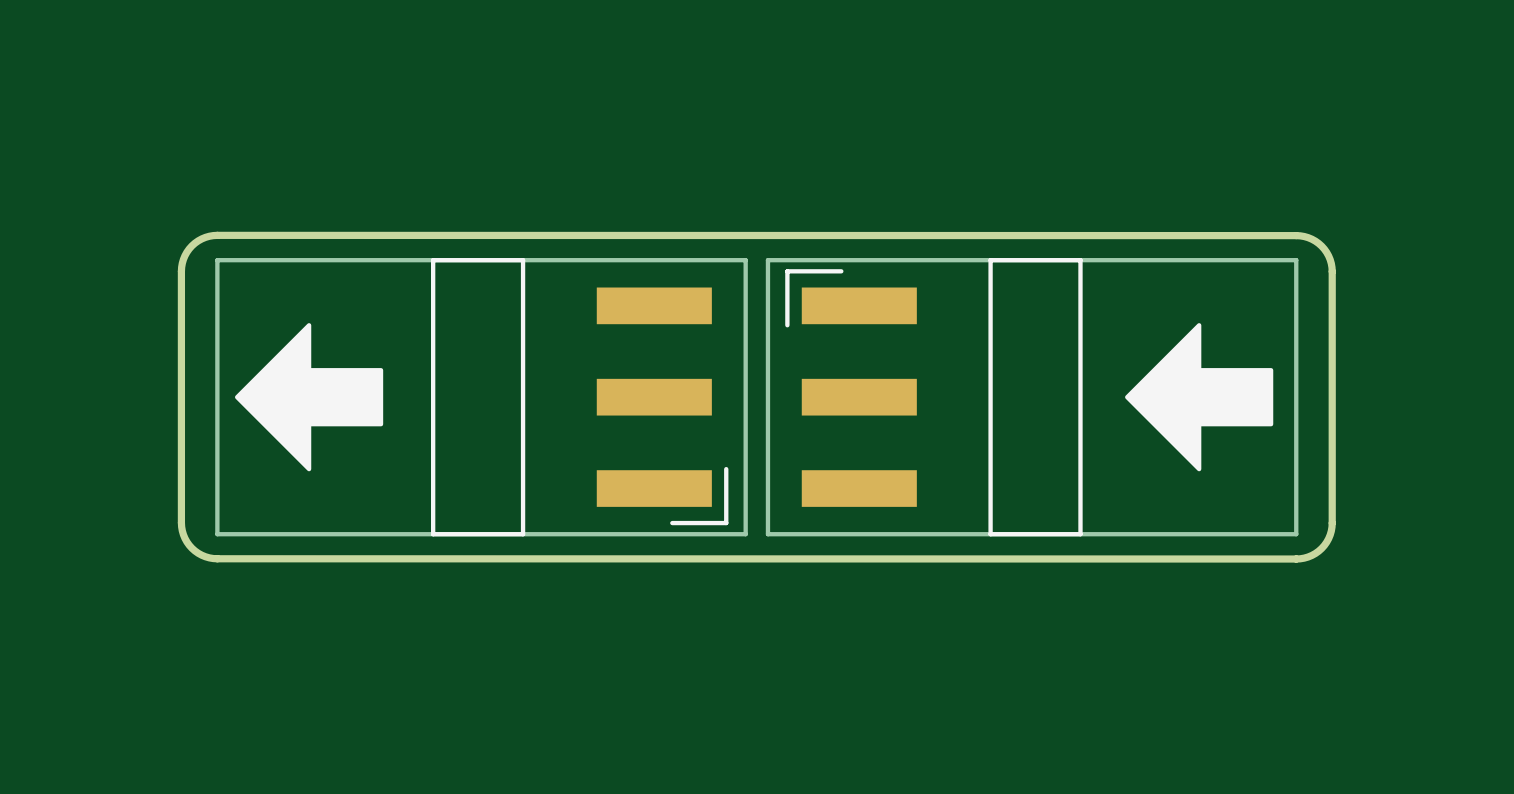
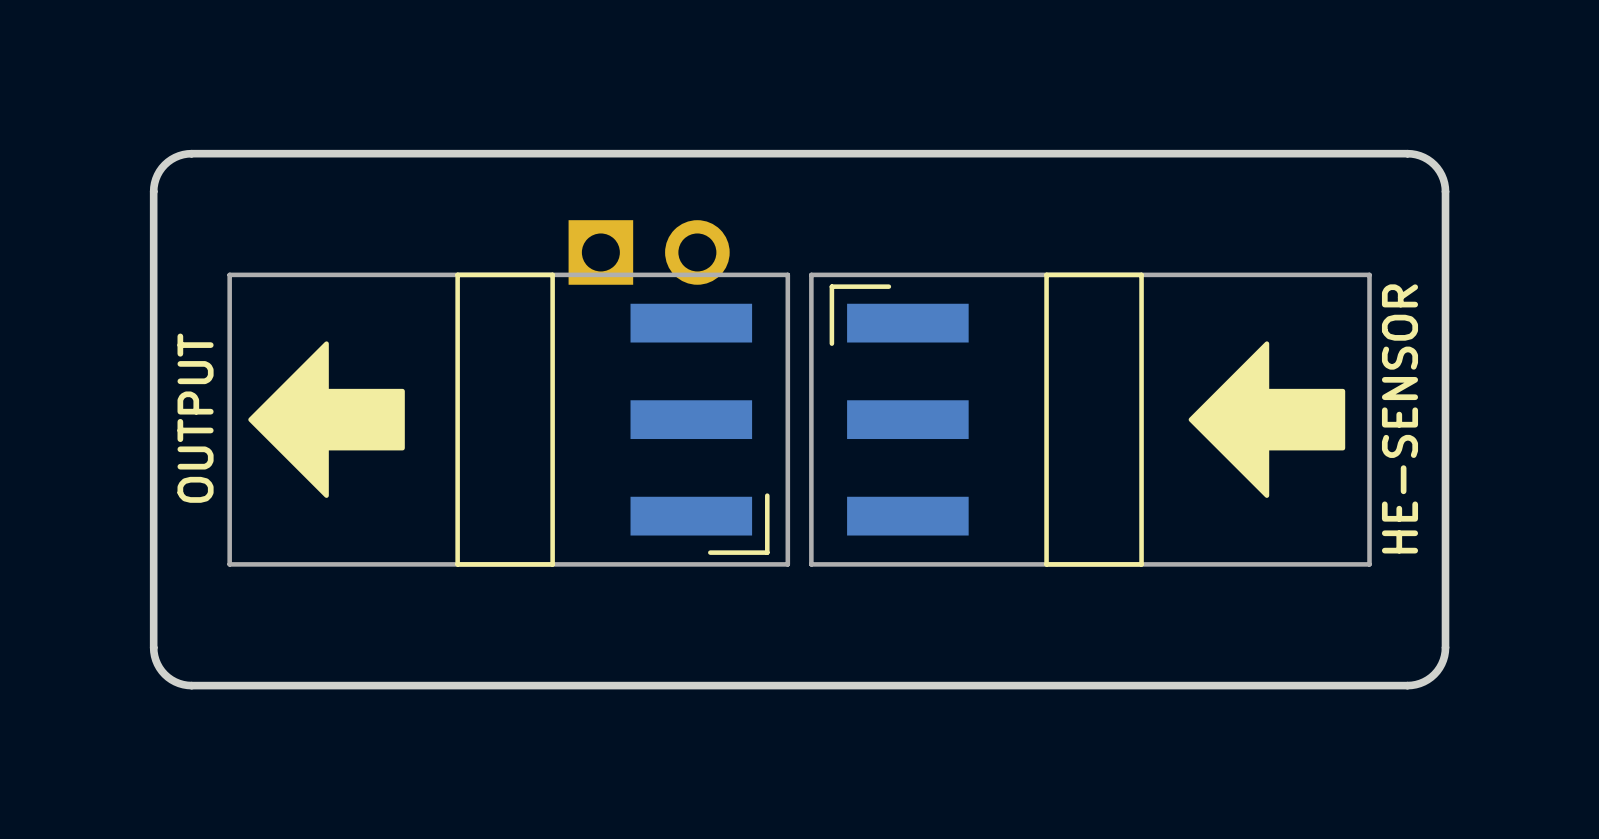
board edge: (217, 235) (1304, 236) (1315, 241) (1324, 249) (1331, 267) (1331, 531) (1326, 542) (1318, 551) (1308, 557) (1296, 559) (209, 557) (191, 548) (184, 538) (181, 526) (181, 271) (184, 255) (191, 245) (201, 238) (217, 235) -> (1407, 153) (1420, 155) (1434, 164) (1441, 175) (1445, 191) (1445, 647) (1443, 660) (1437, 671) (1420, 683) (1407, 685) (191, 685) (179, 683) (167, 677) (155, 660) (153, 647) (153, 191) (159, 171) (167, 161) (179, 155) (191, 153) (1407, 153)
part: none -> (649, 252)
text: none -> HE-SENSOR (1399, 418)
text: none -> OUTPUT (195, 418)

